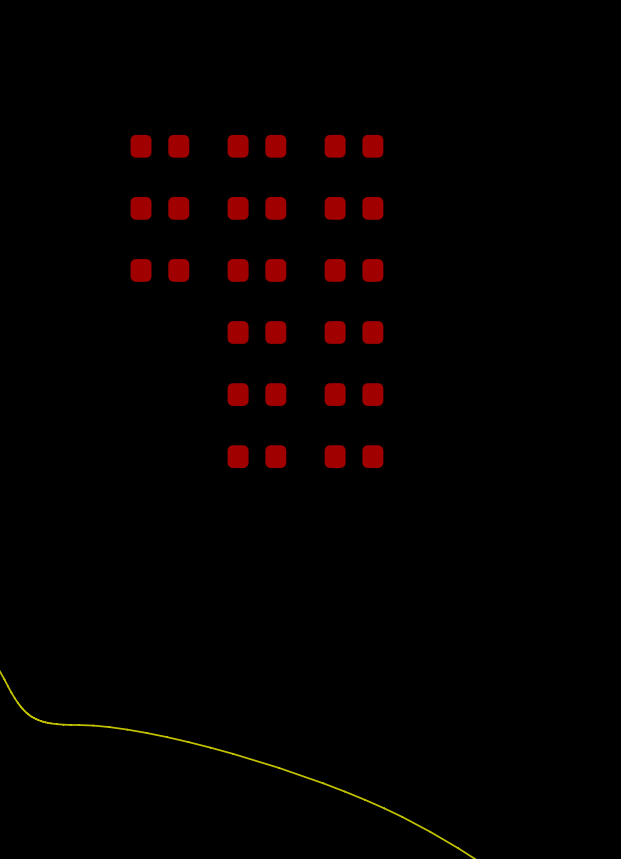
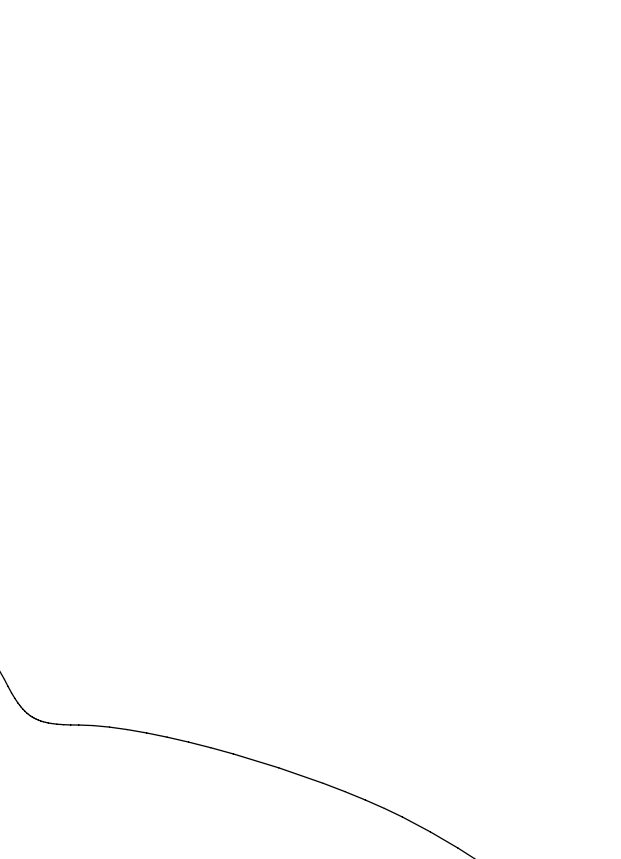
part: (159, 146) -> none
part: (256, 146) -> none
part: (354, 146) -> none
part: (159, 208) -> none
part: (256, 208) -> none
part: (354, 208) -> none
part: (159, 270) -> none
part: (256, 270) -> none
part: (354, 270) -> none
part: (256, 332) -> none
part: (354, 332) -> none
part: (256, 394) -> none
part: (354, 394) -> none
part: (256, 456) -> none
part: (354, 456) -> none

